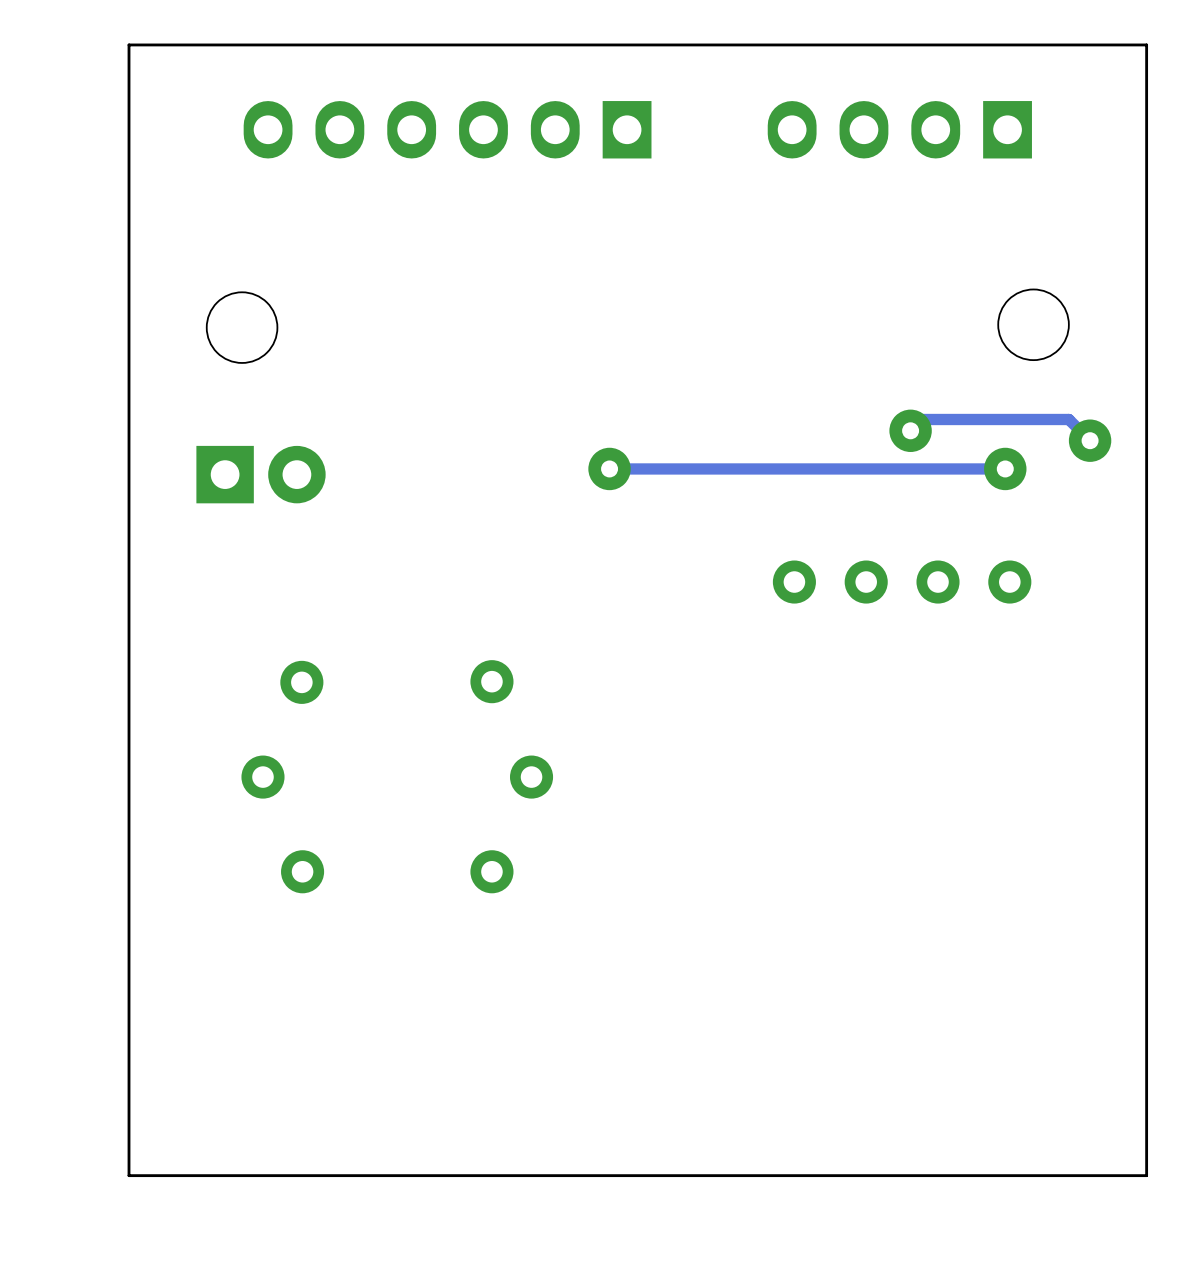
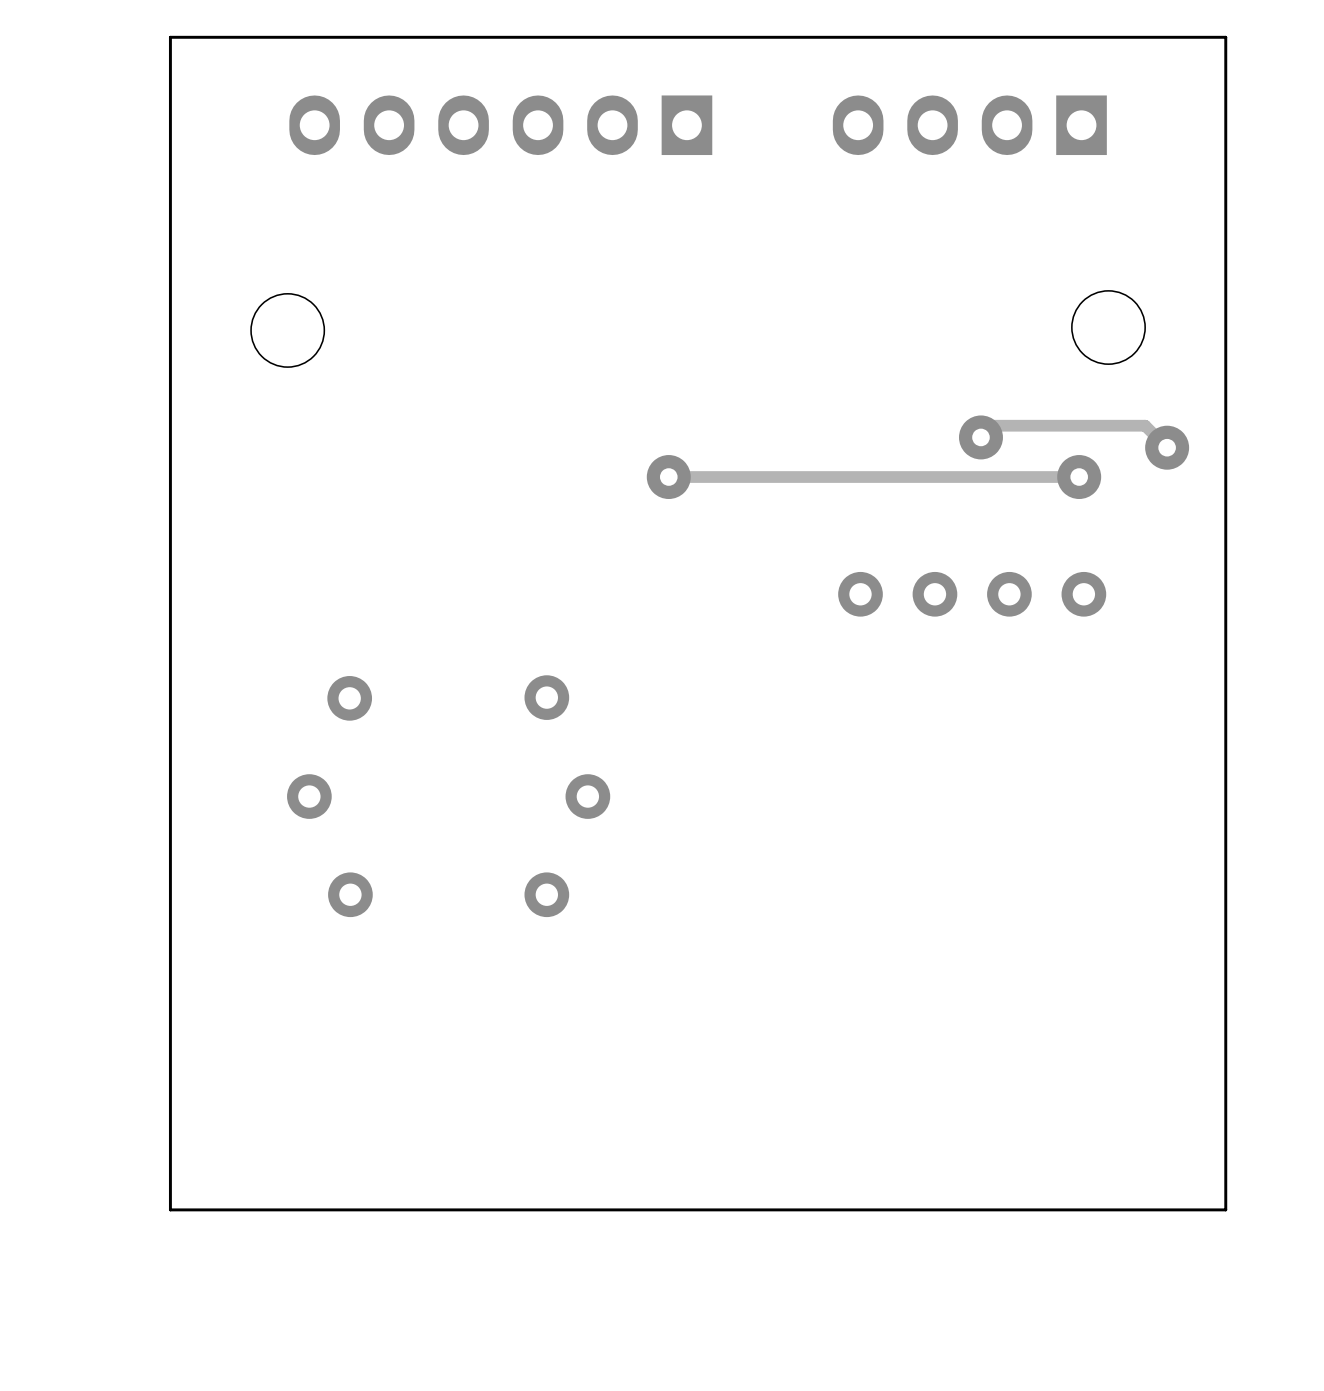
part: (261, 474) -> none

